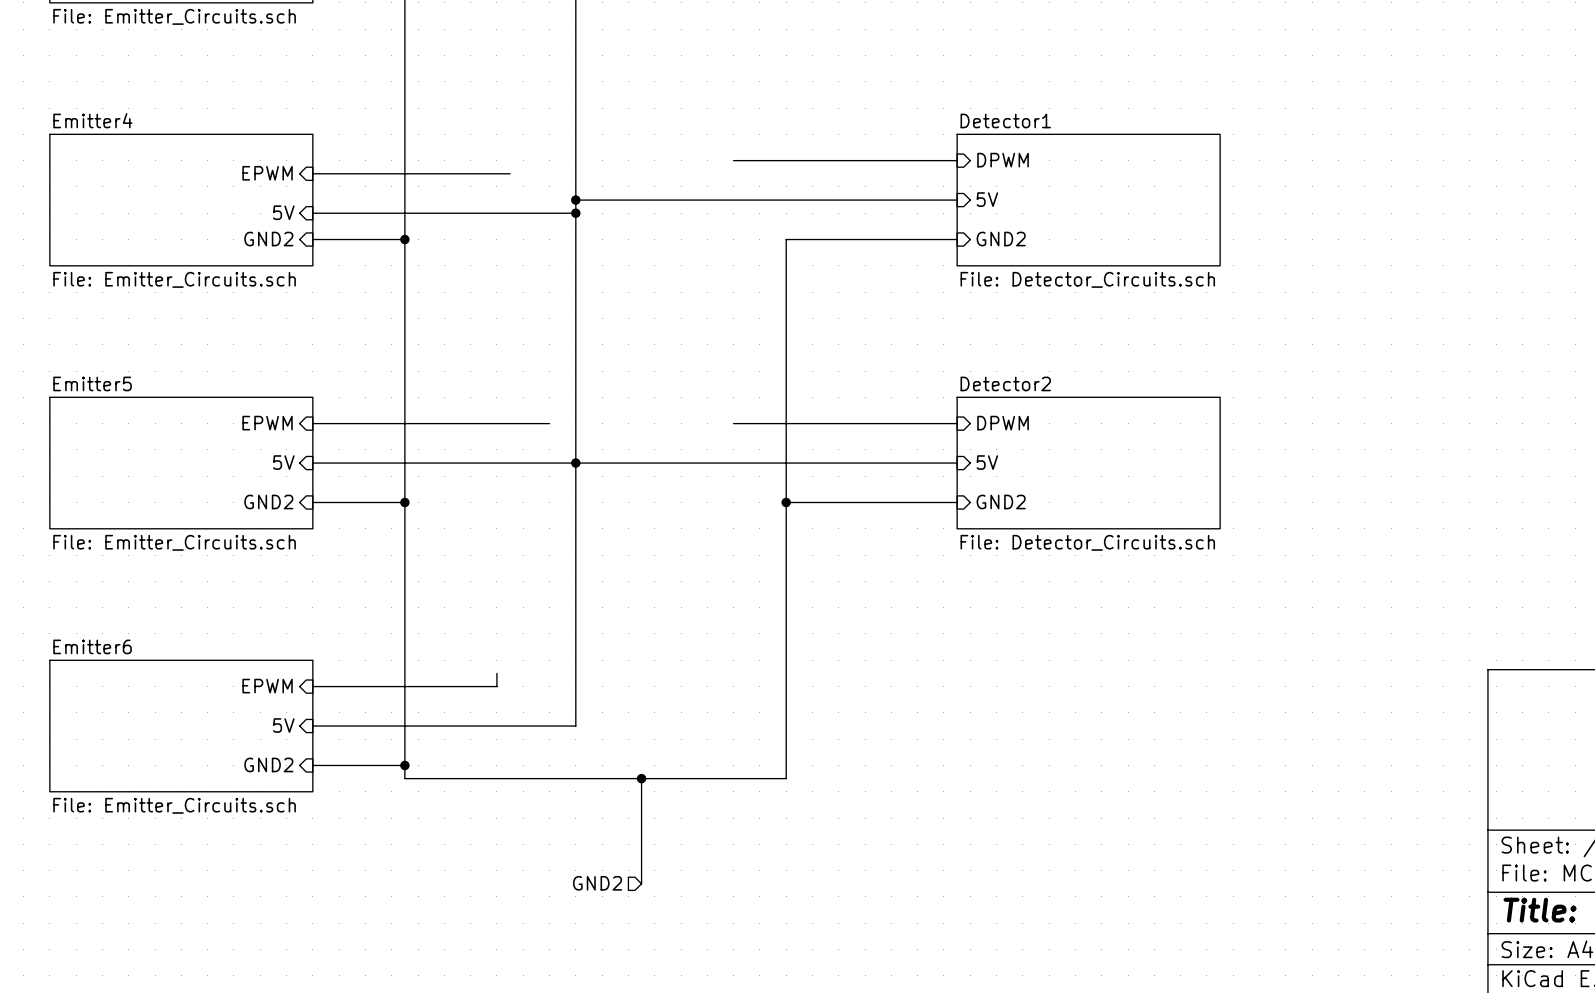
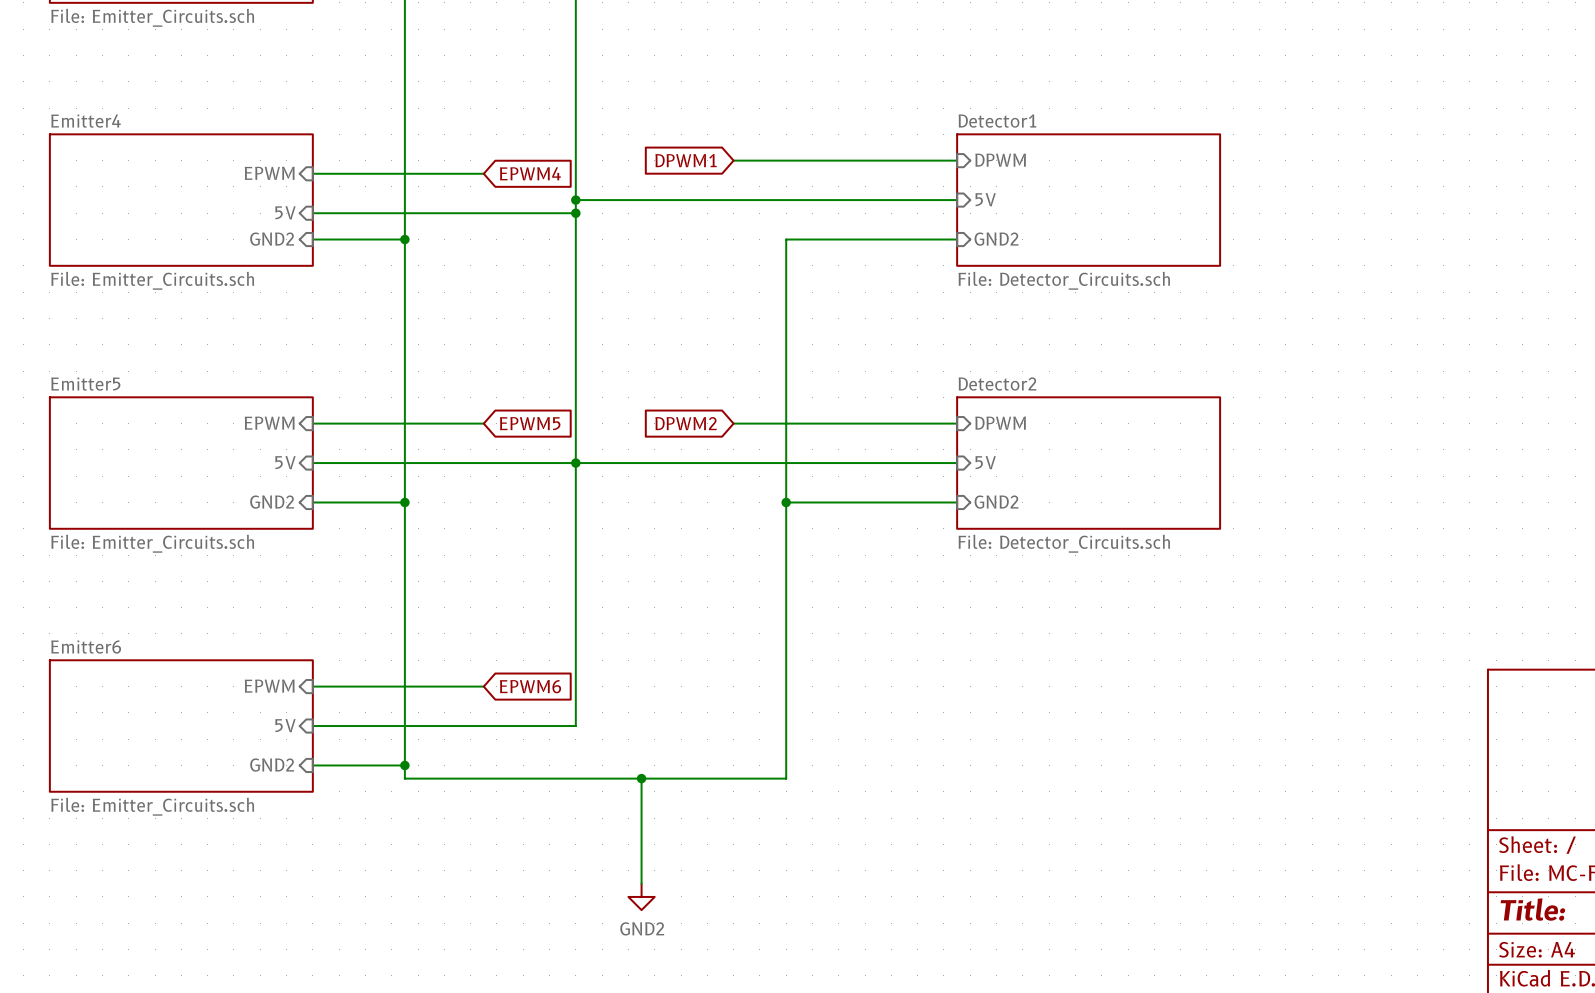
global label: none -> DPWM1 (686, 160)
wire: (483, 173) (510, 173) -> none
global label: none -> EPWM4 (530, 173)
wire: (483, 423) (549, 423) -> none
global label: none -> EPWM5 (530, 423)
global label: none -> DPWM2 (686, 423)
wire: (496, 673) (496, 686) (483, 686) -> none
global label: none -> EPWM6 (530, 686)
hierarchical label: GND2 (597, 883) -> none
power symbol: none -> GND2 (641, 896)

